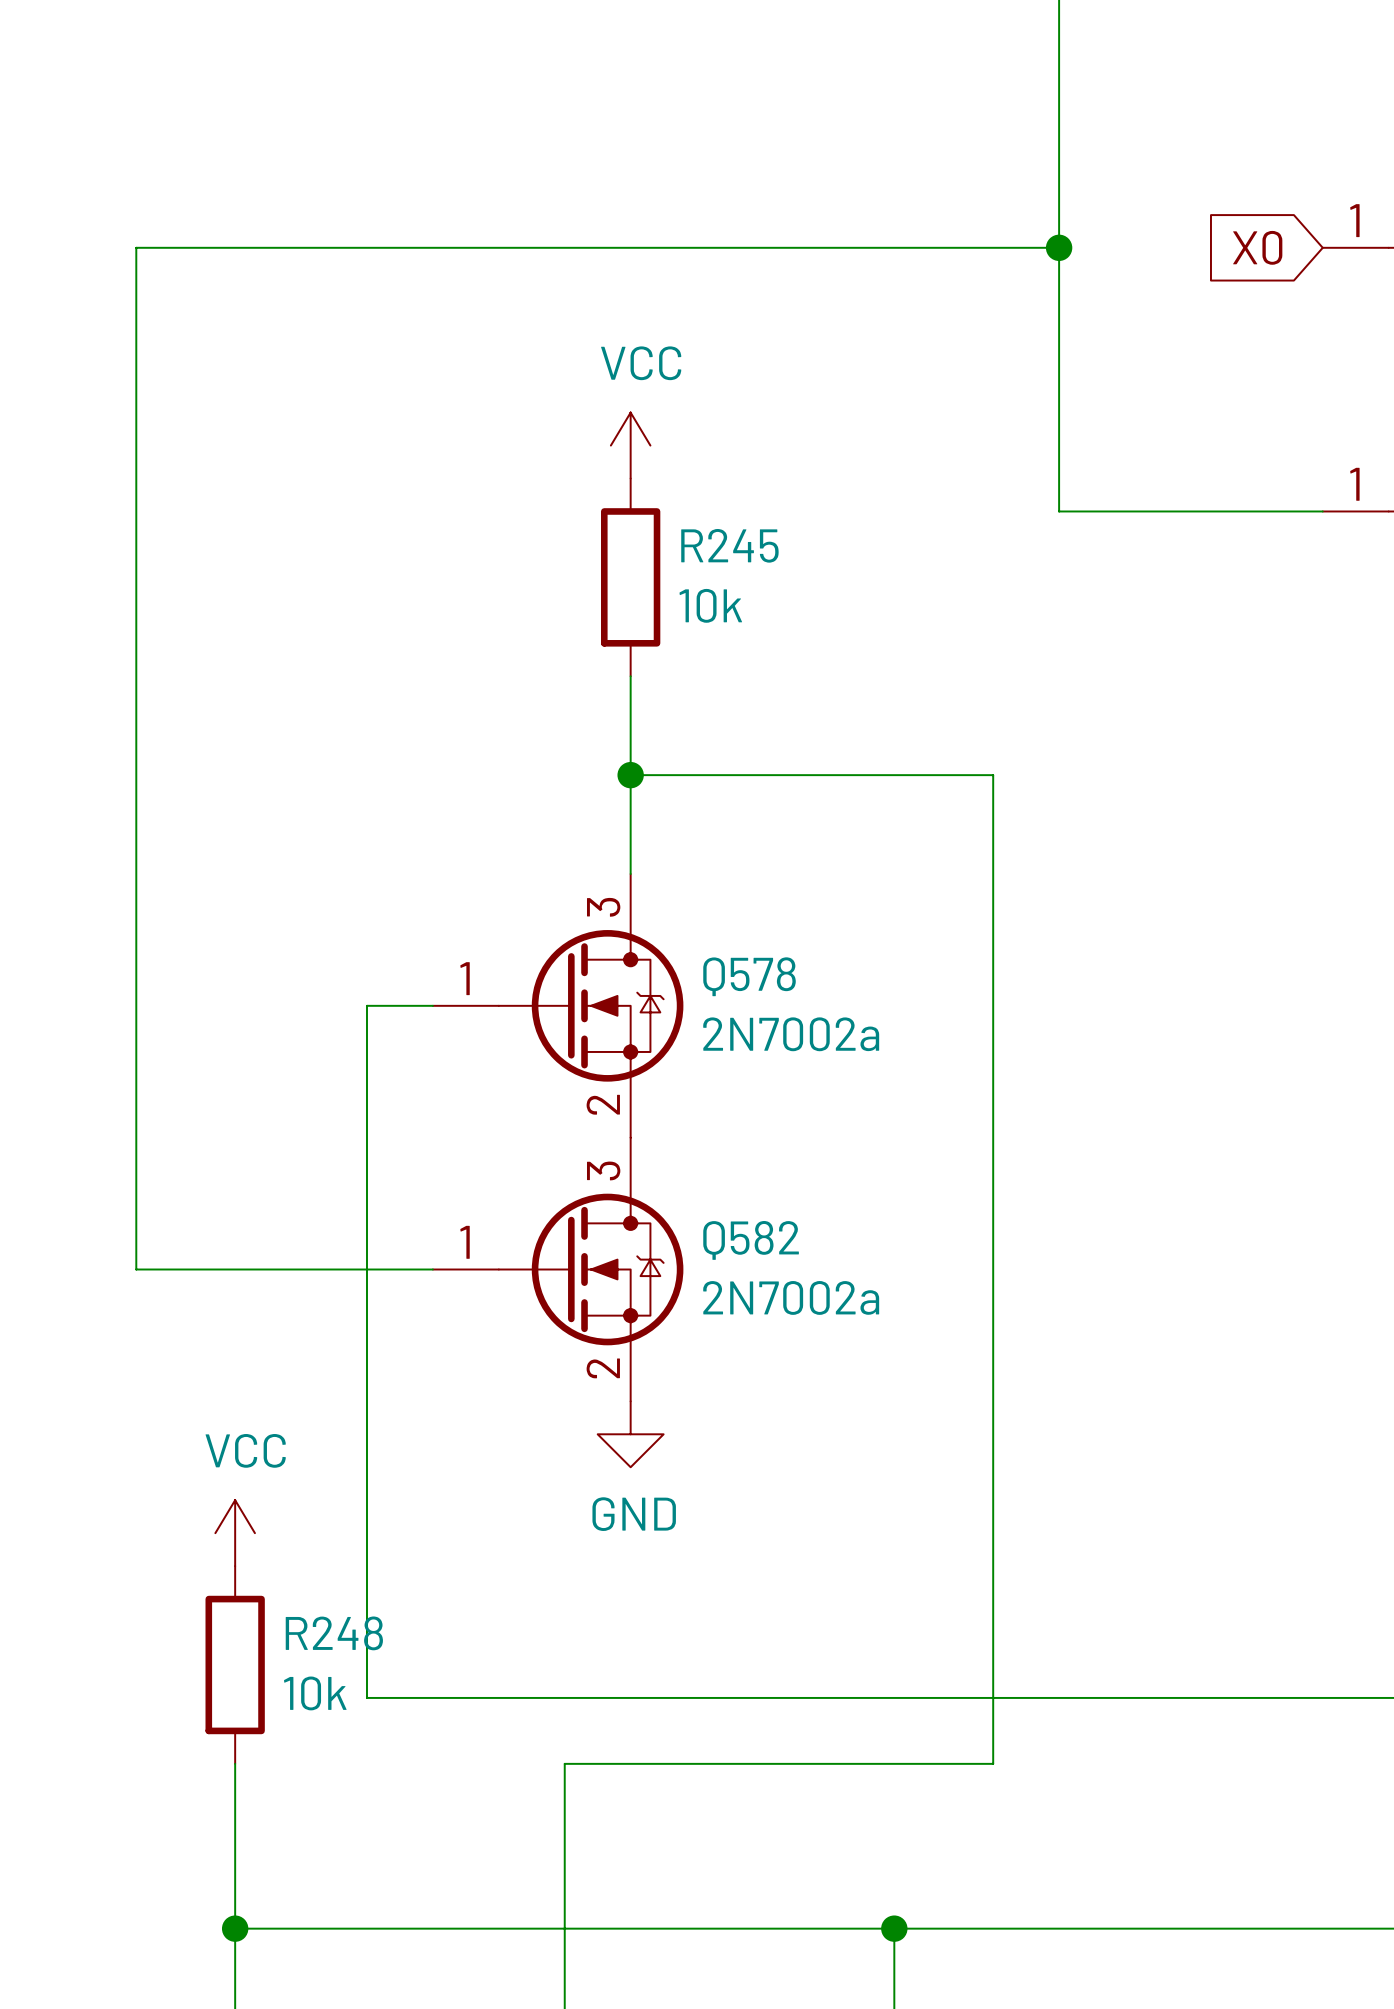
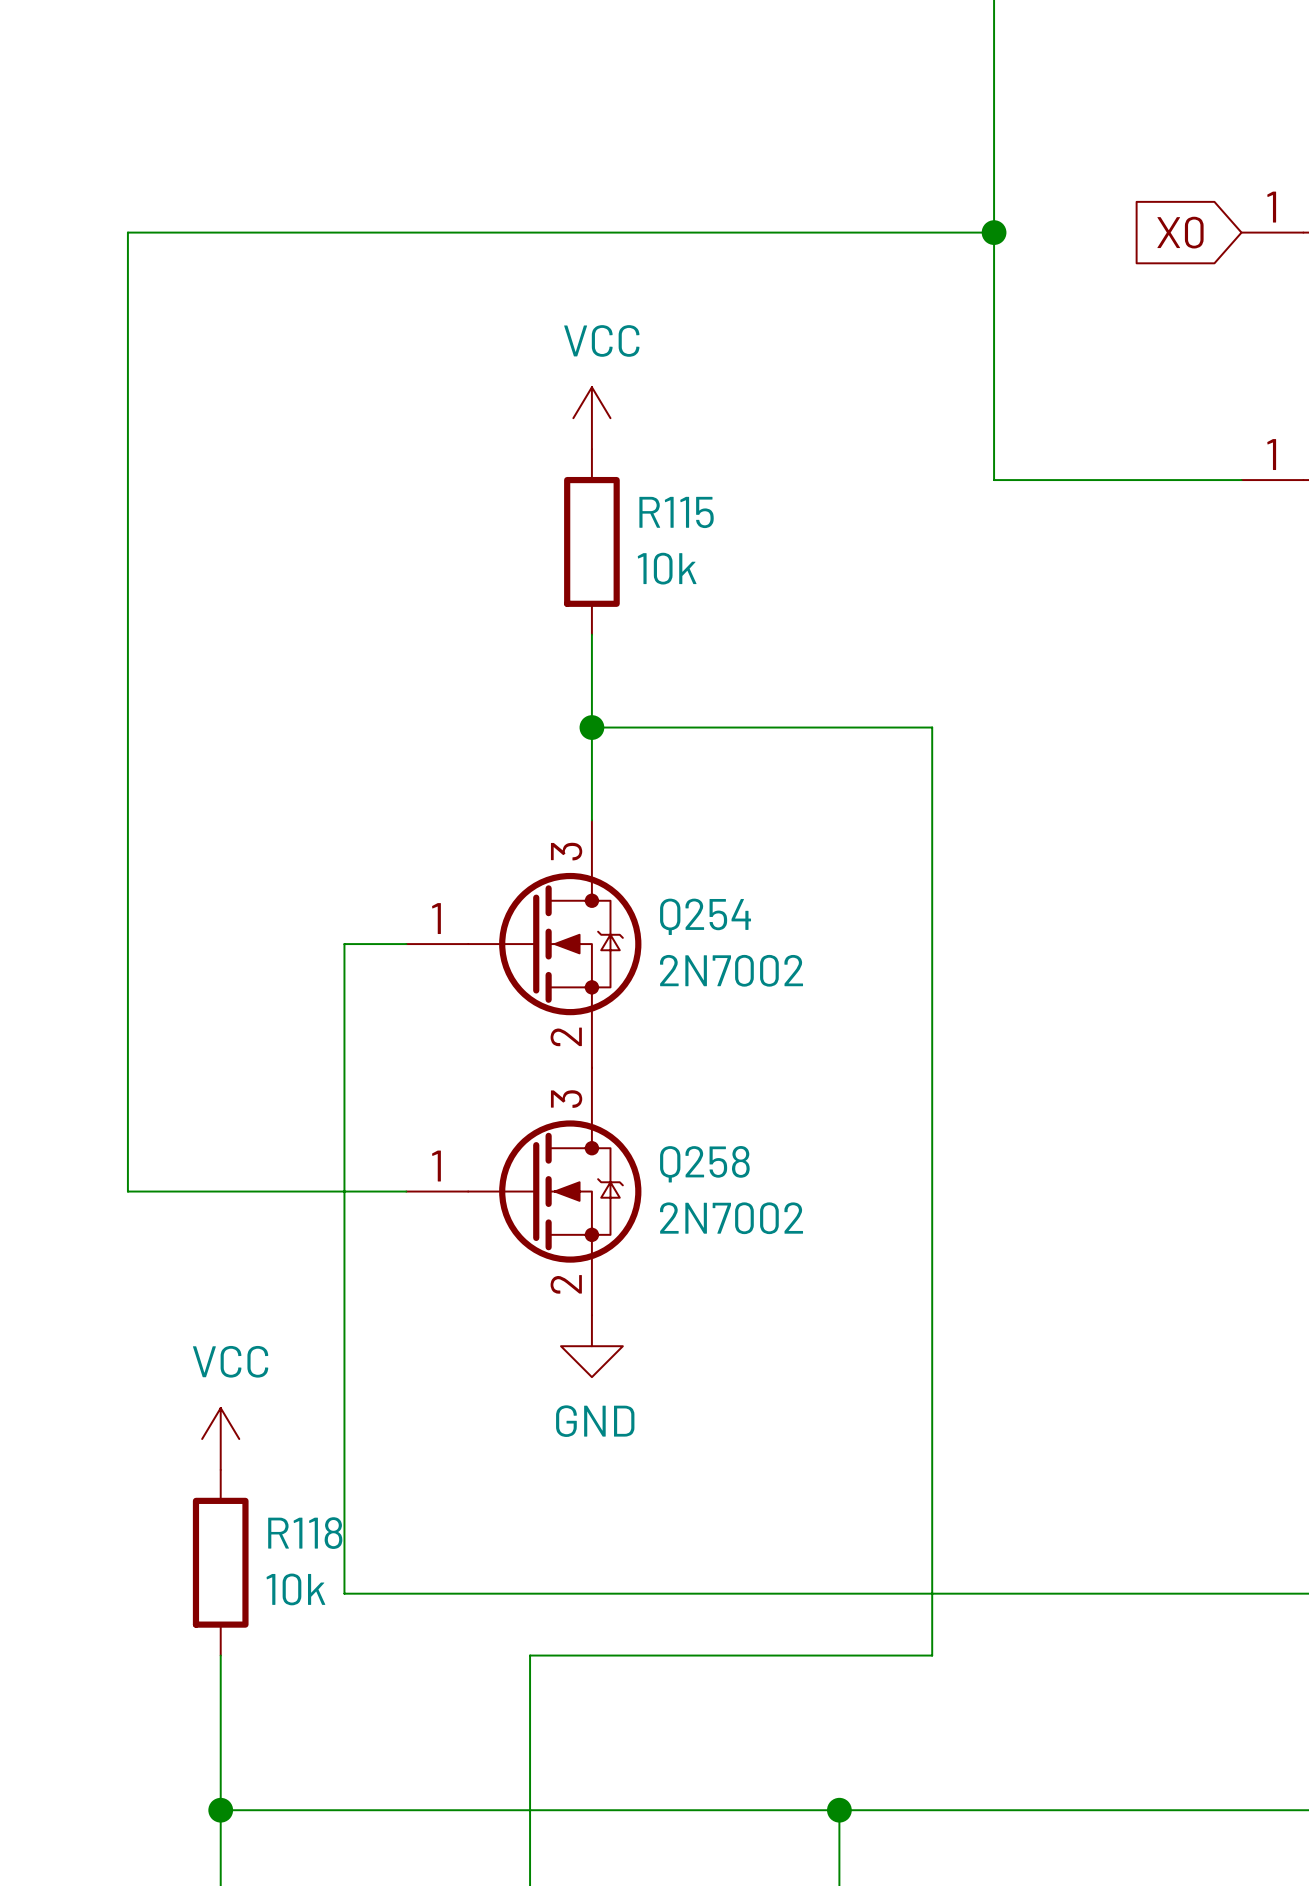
R245 name: R245 (729, 545) -> R115 (676, 512)
Q578 name: Q578 (749, 976) -> Q254 (705, 916)
Q578 value: 2N7002a (791, 1034) -> 2N7002 (731, 970)
Q582 name: Q582 (751, 1240) -> Q258 (704, 1164)
Q582 value: 2N7002a (791, 1297) -> 2N7002 (731, 1218)
R248 name: R248 (334, 1633) -> R118 (305, 1533)

